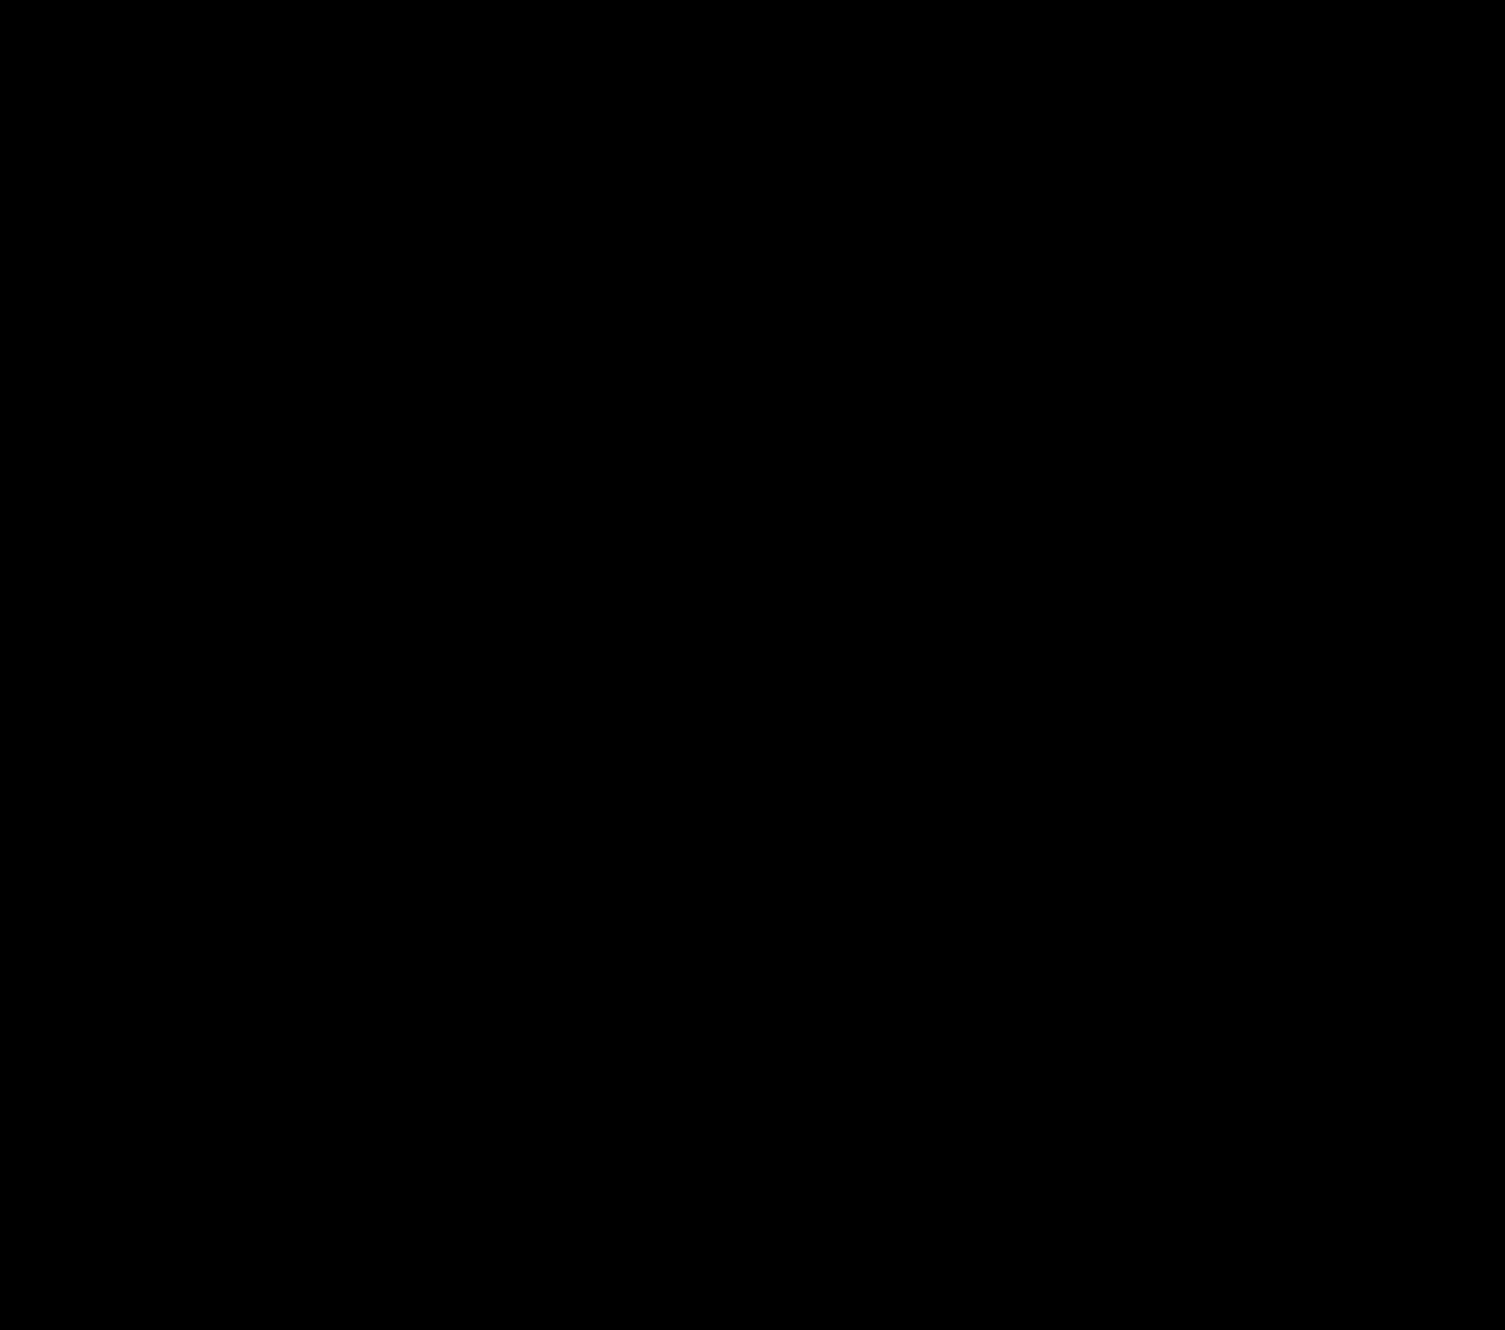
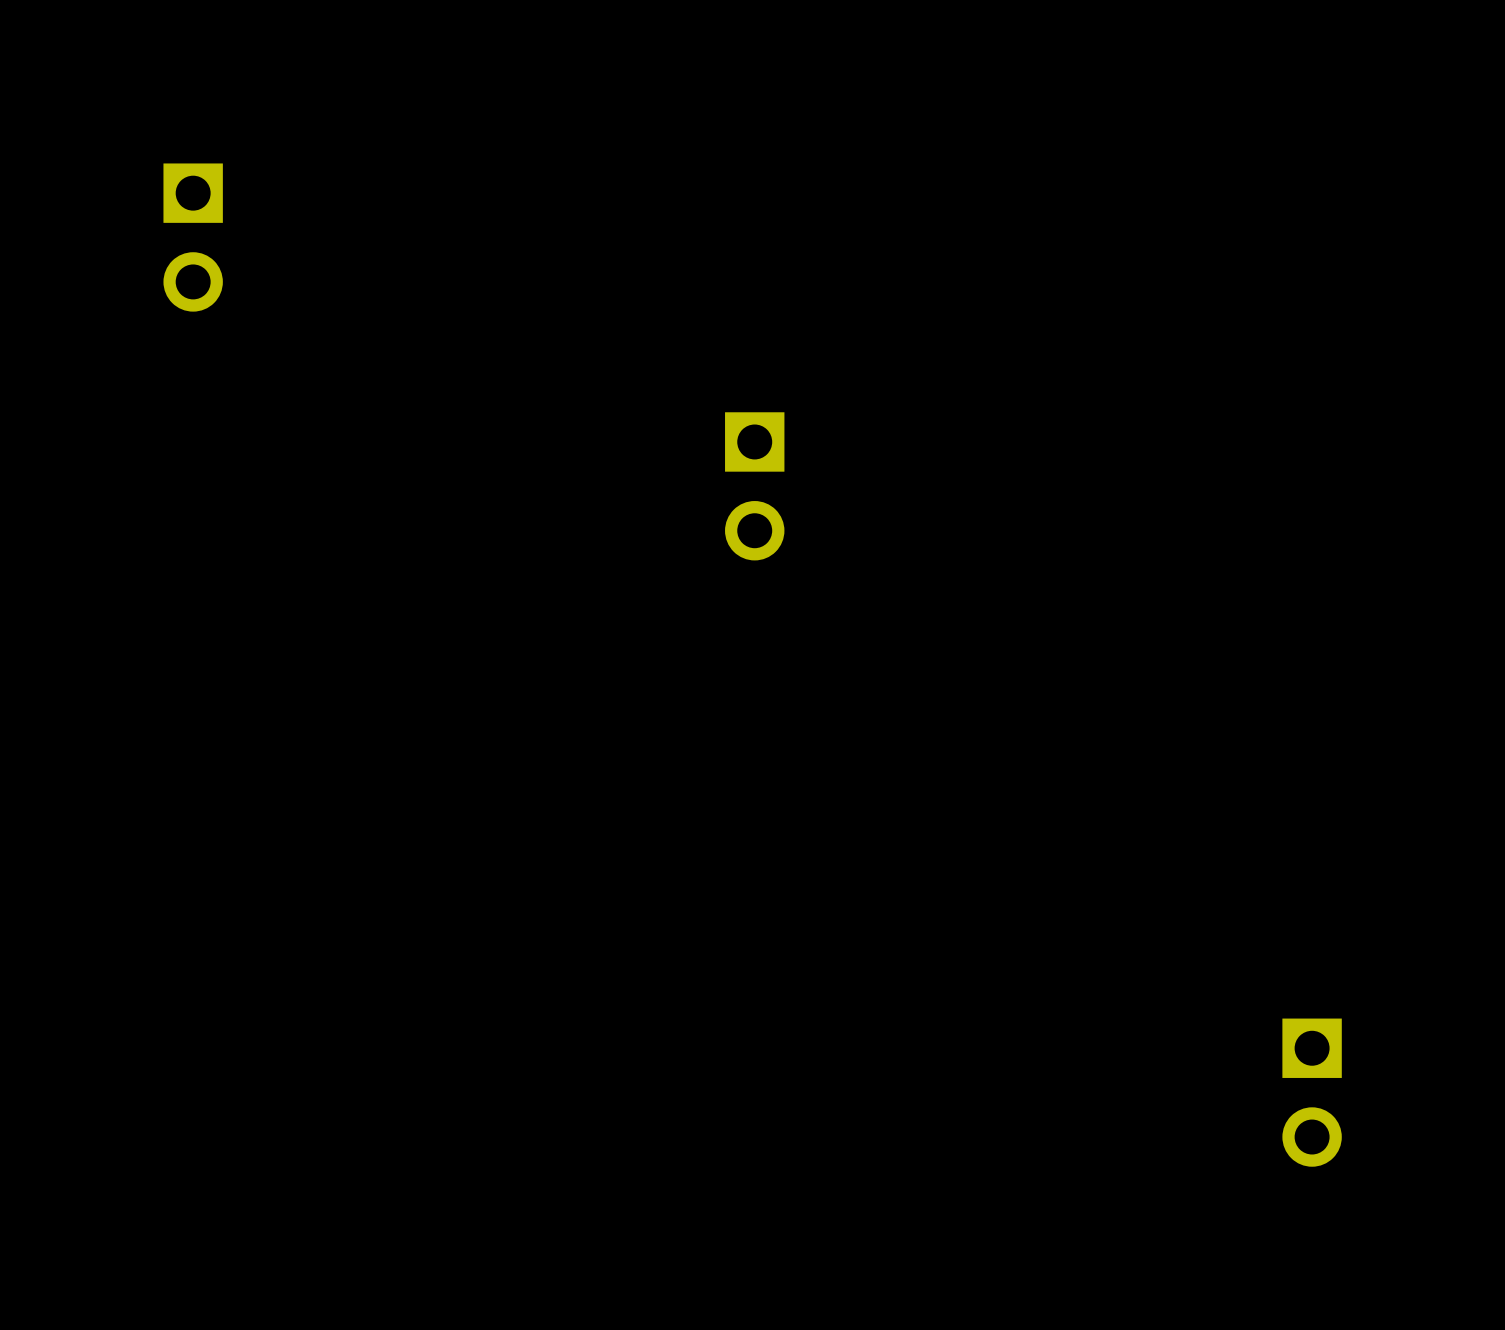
part: none -> (193, 237)
part: none -> (754, 486)
part: none -> (1312, 1092)

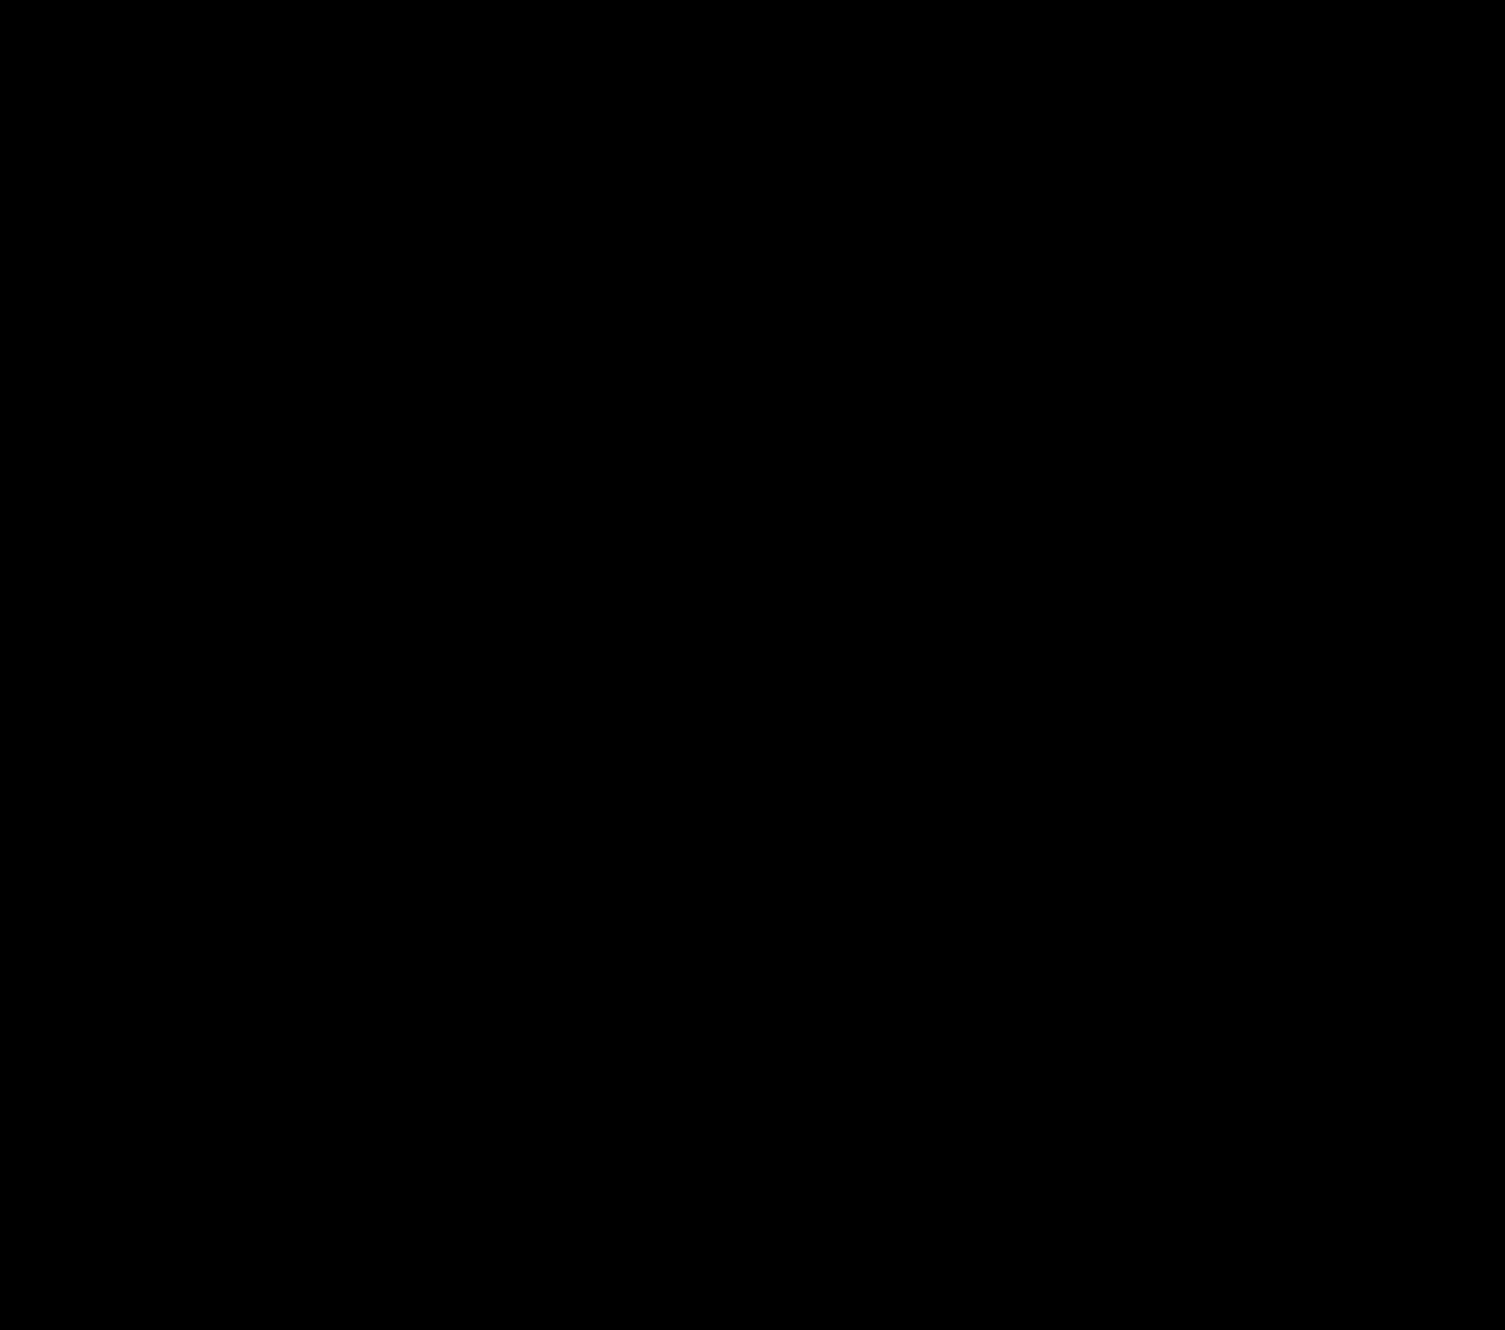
part: (193, 237) -> none
part: (754, 486) -> none
part: (1312, 1092) -> none

